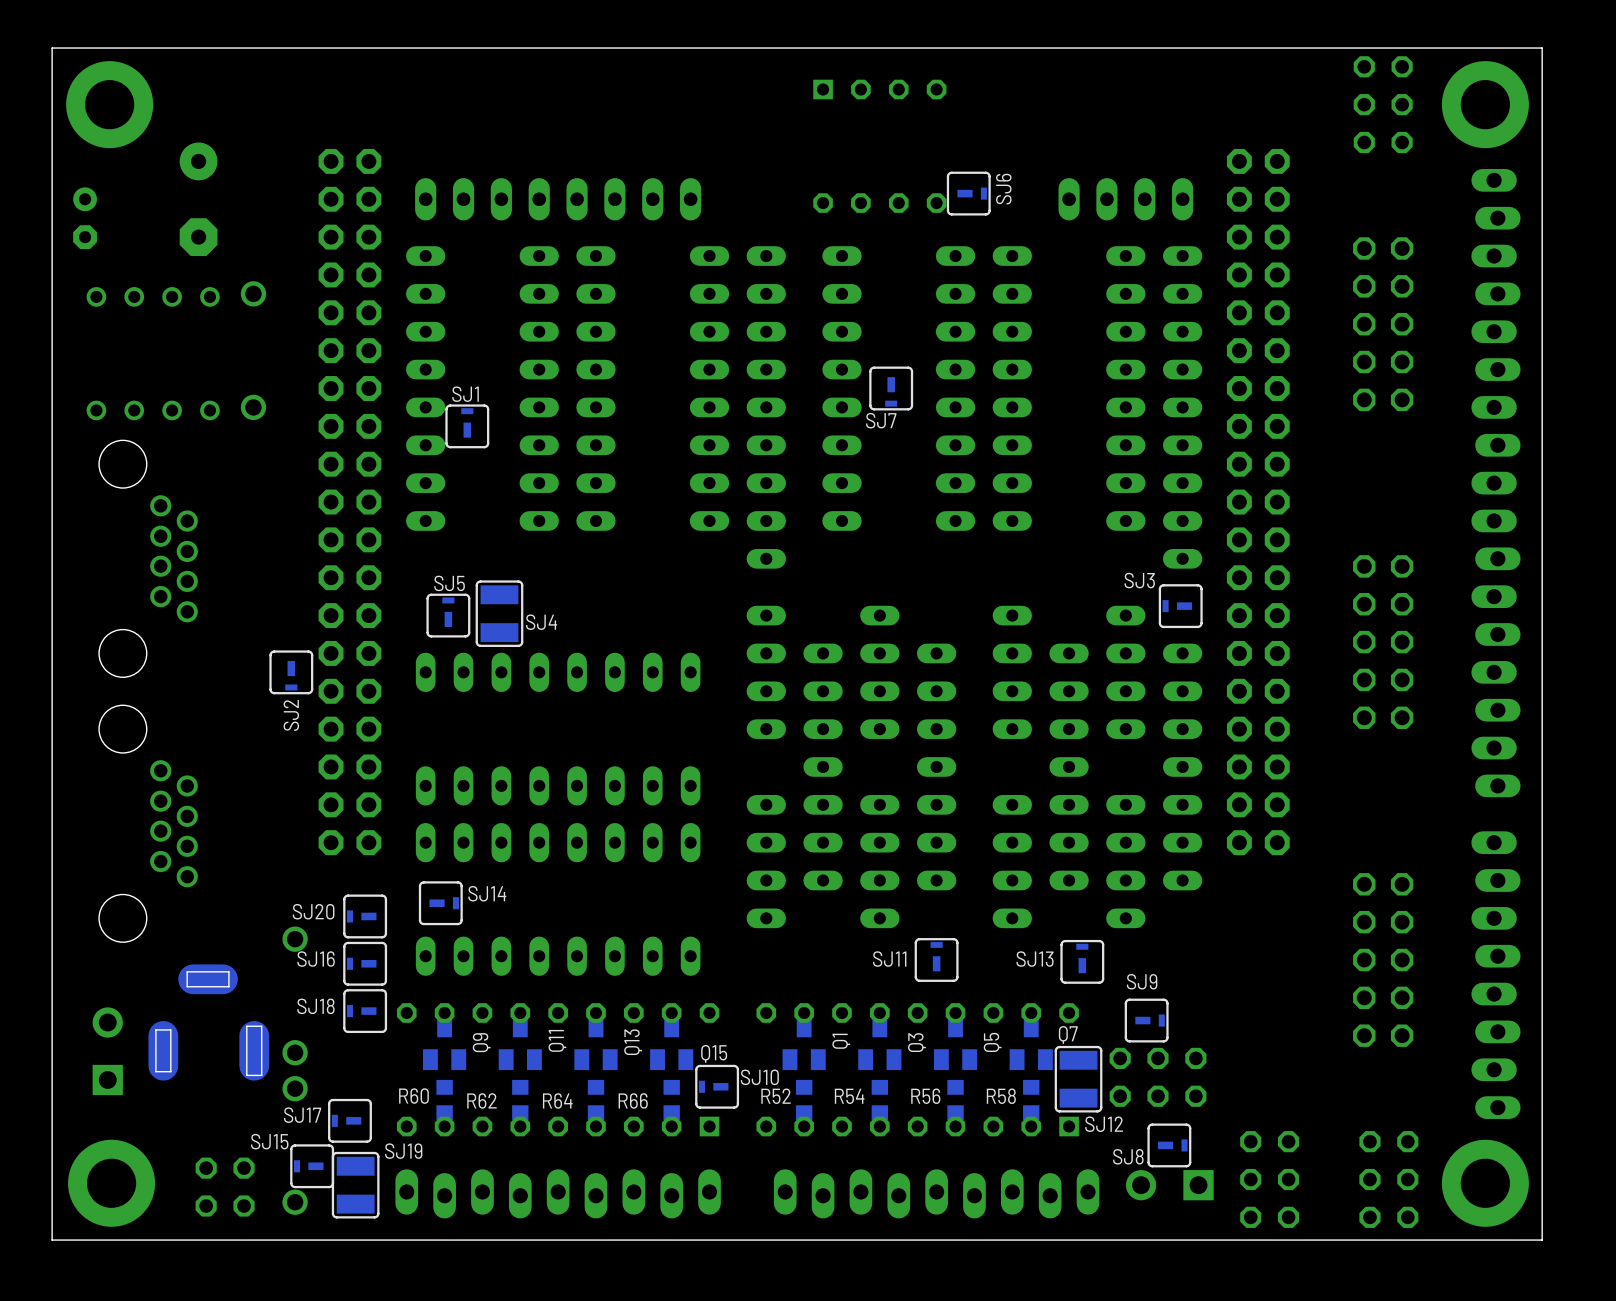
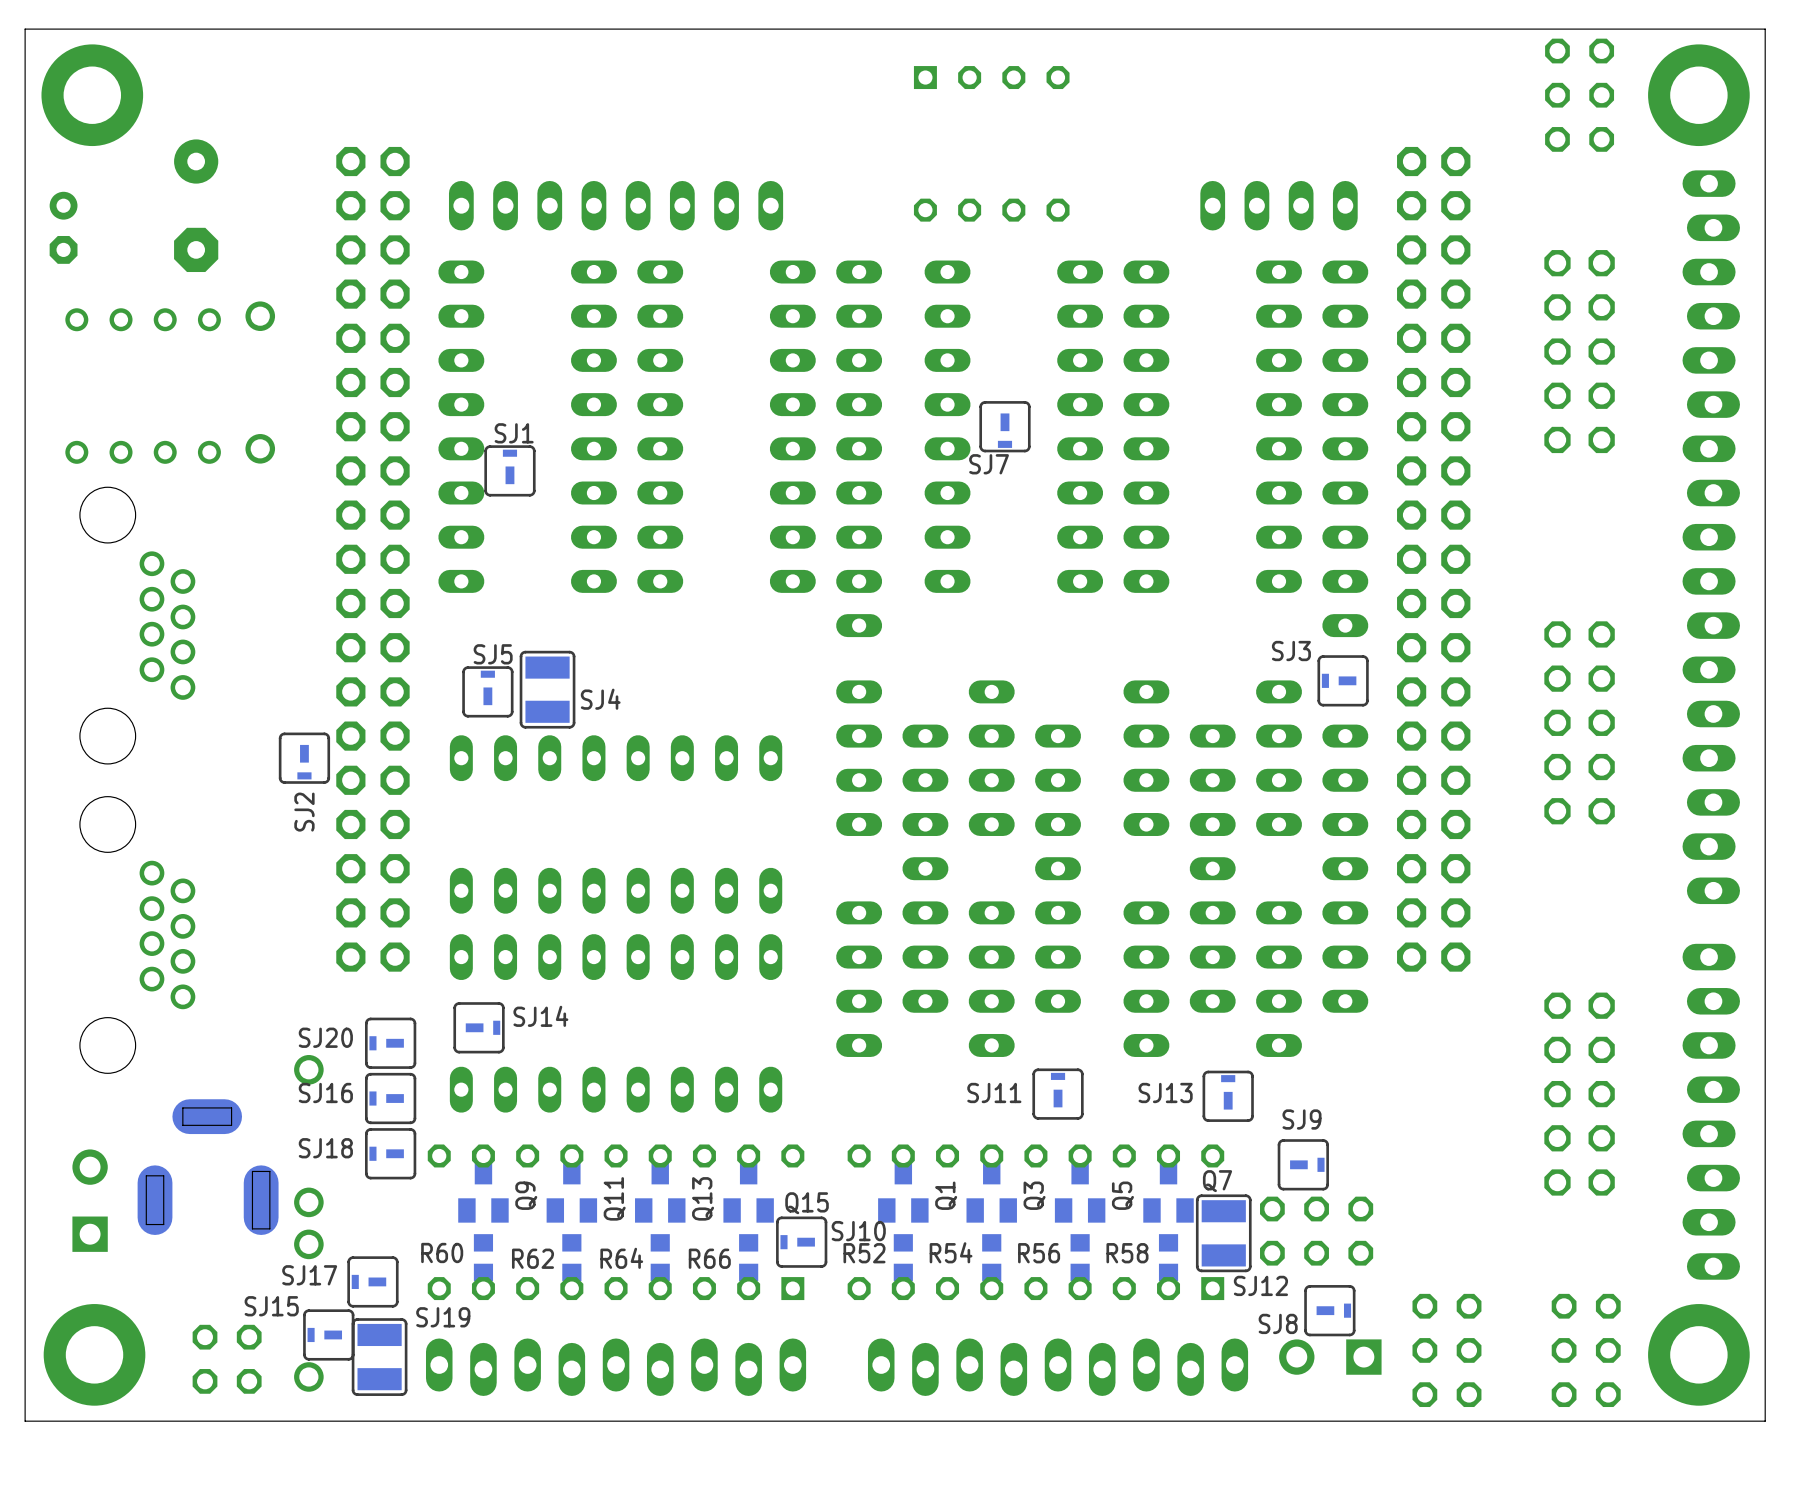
SJ6: (968, 193) -> none

